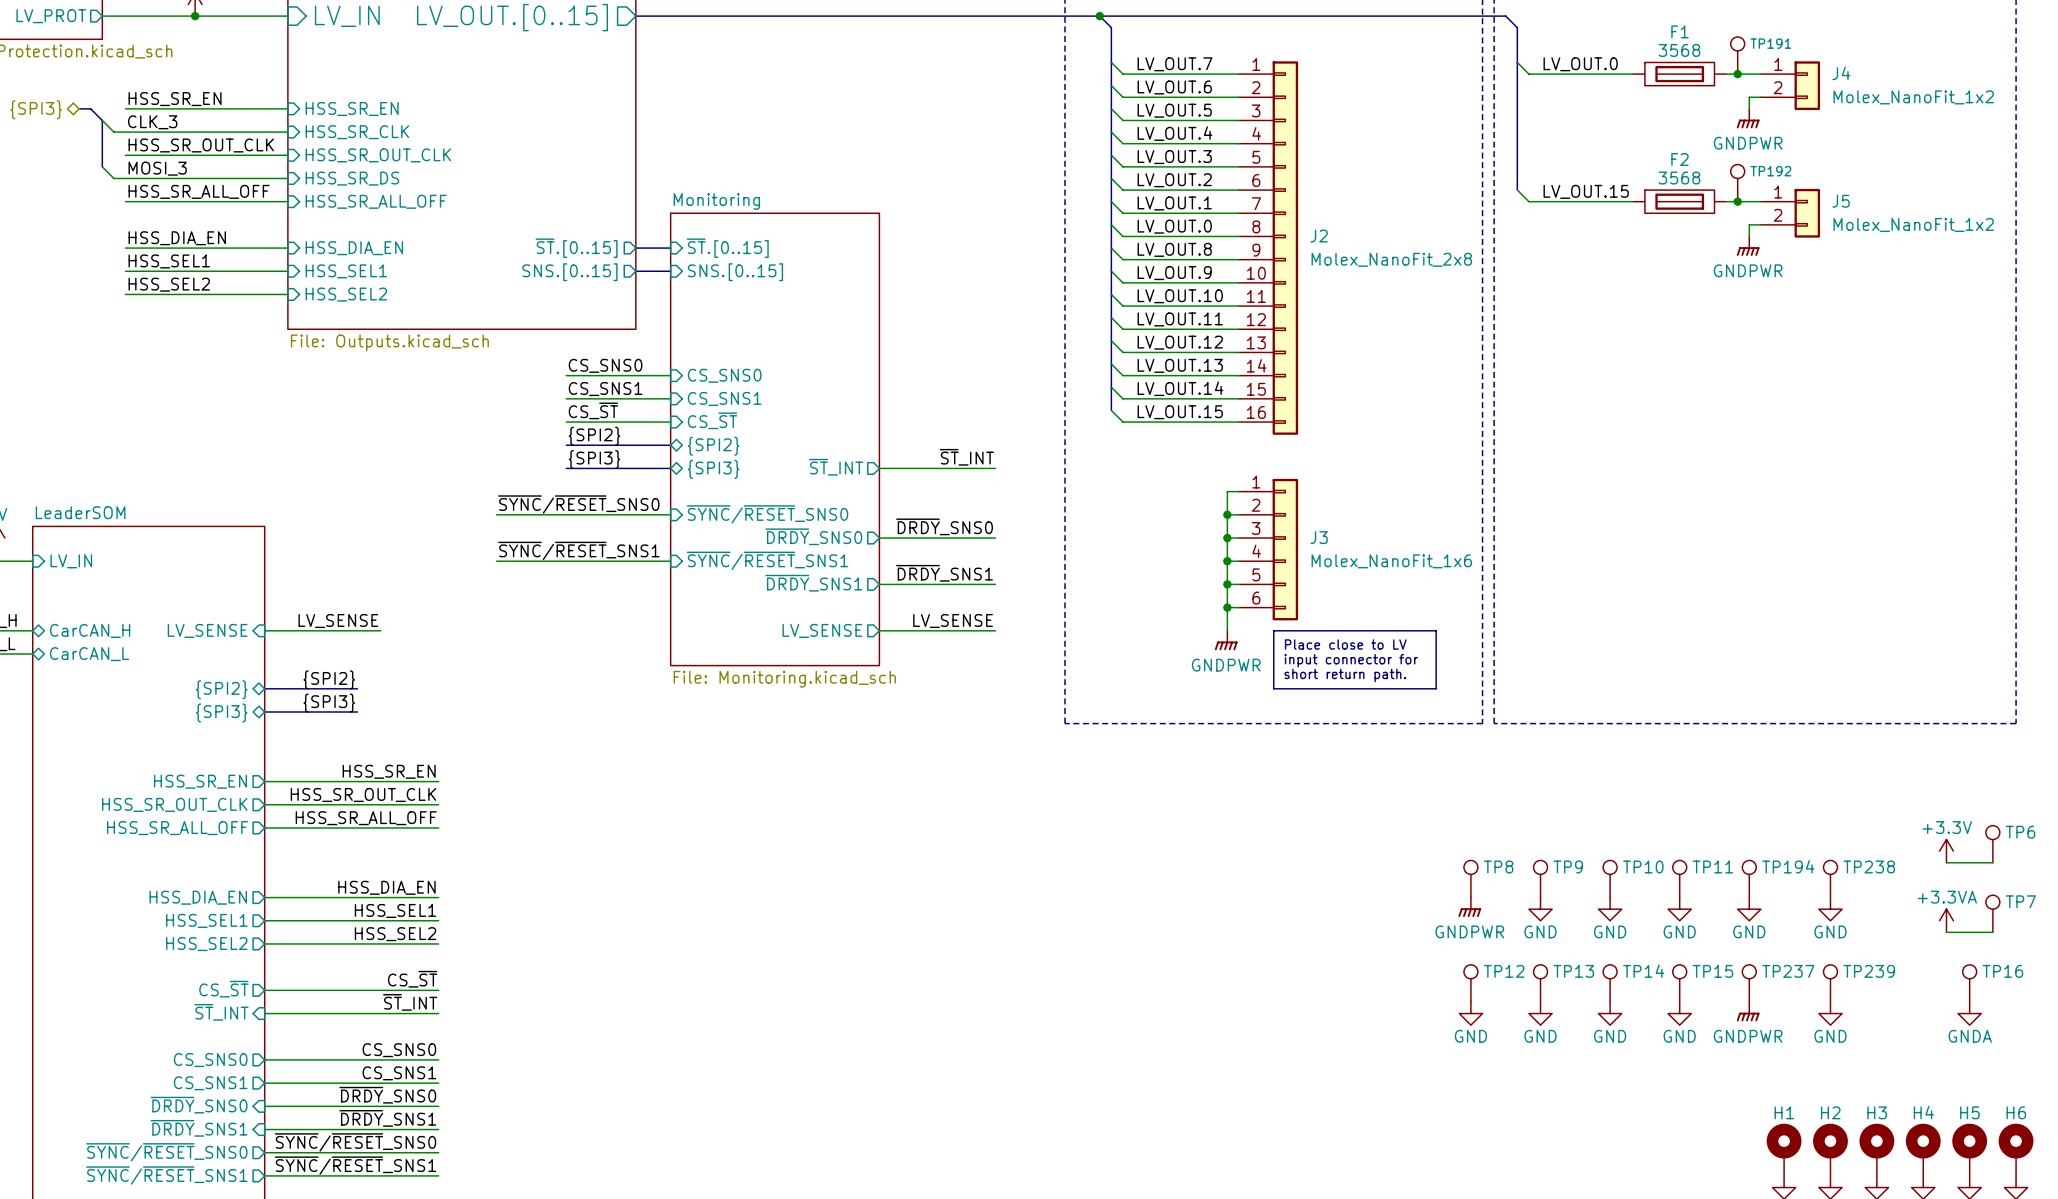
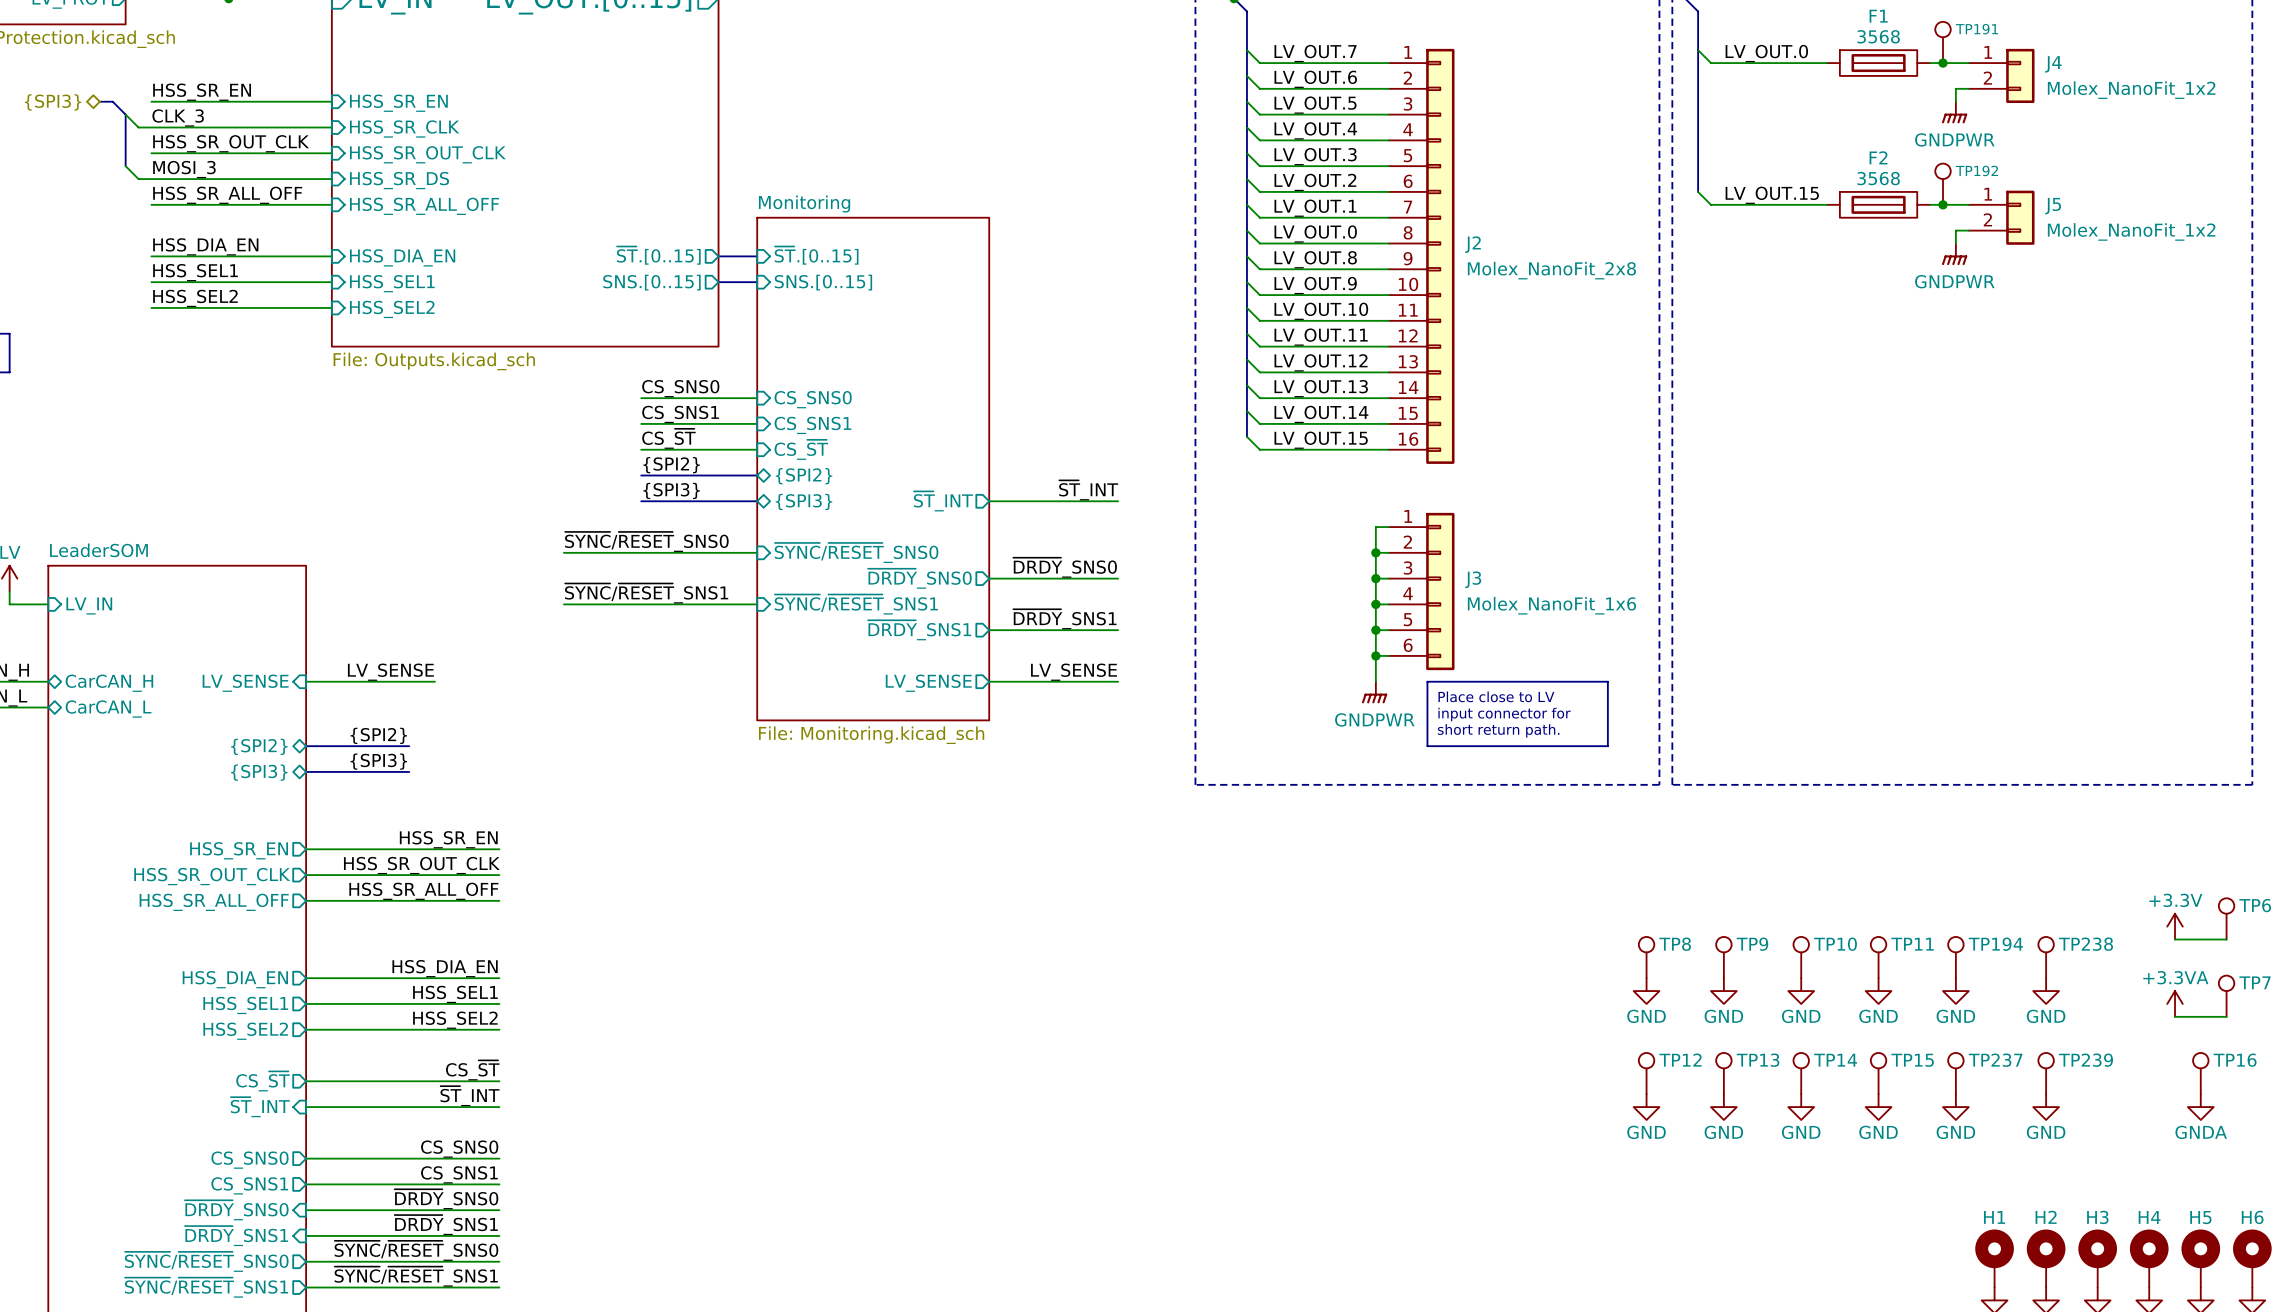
power symbol: GNDPWR (1469, 907) -> GND (1646, 991)
power symbol: GNDPWR (1748, 1011) -> GND (1955, 1107)

